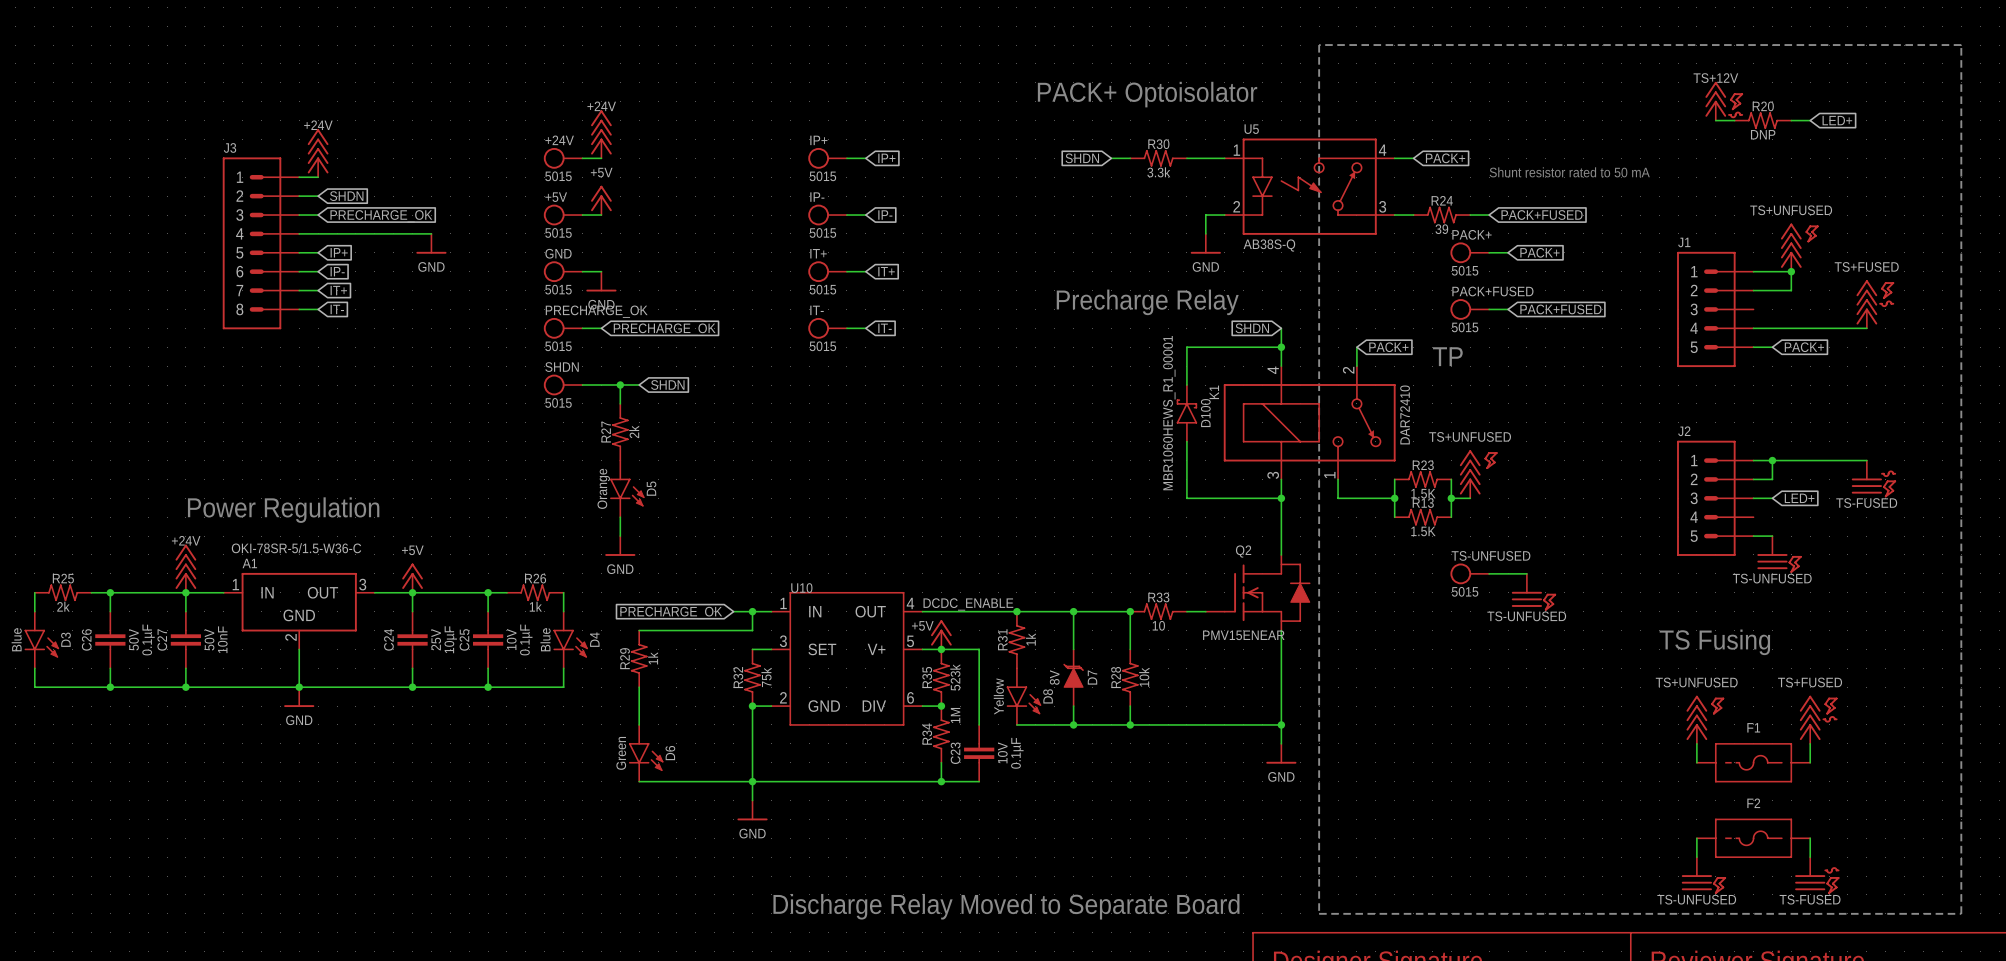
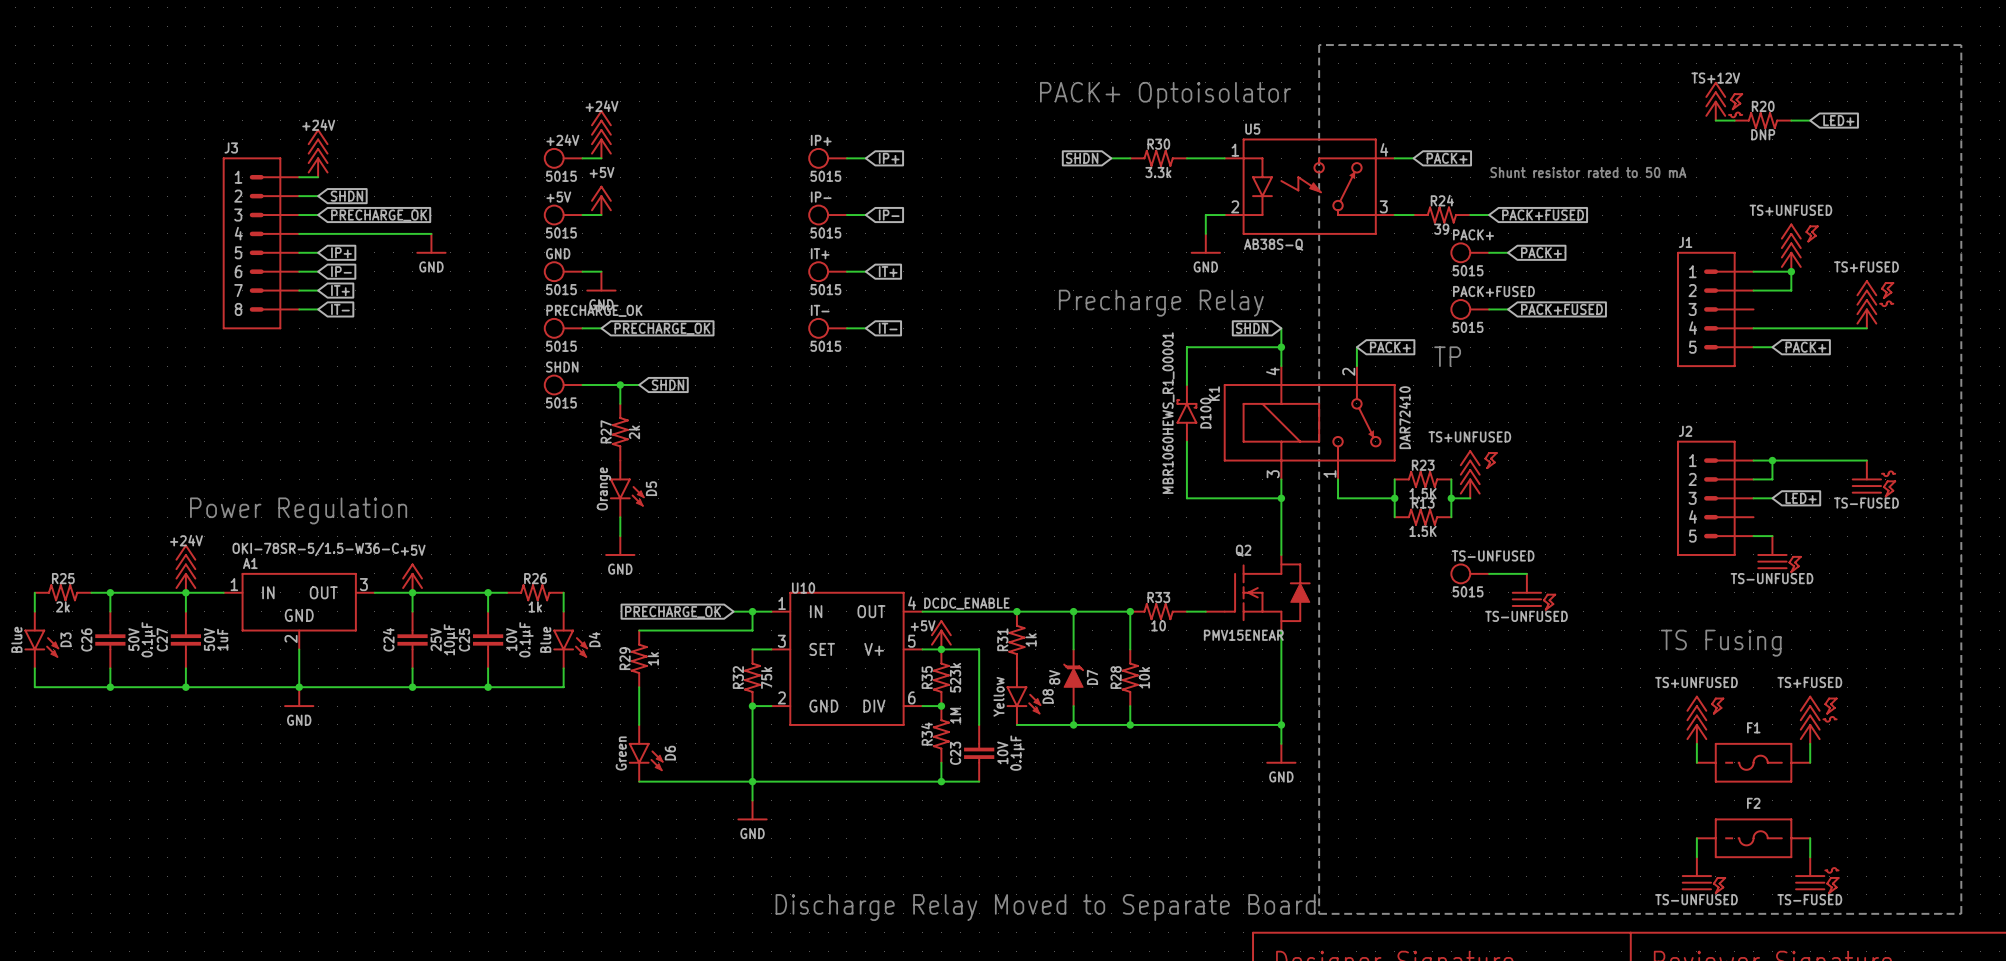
C27 text: 10nF (222, 639) -> 1uF (222, 639)

